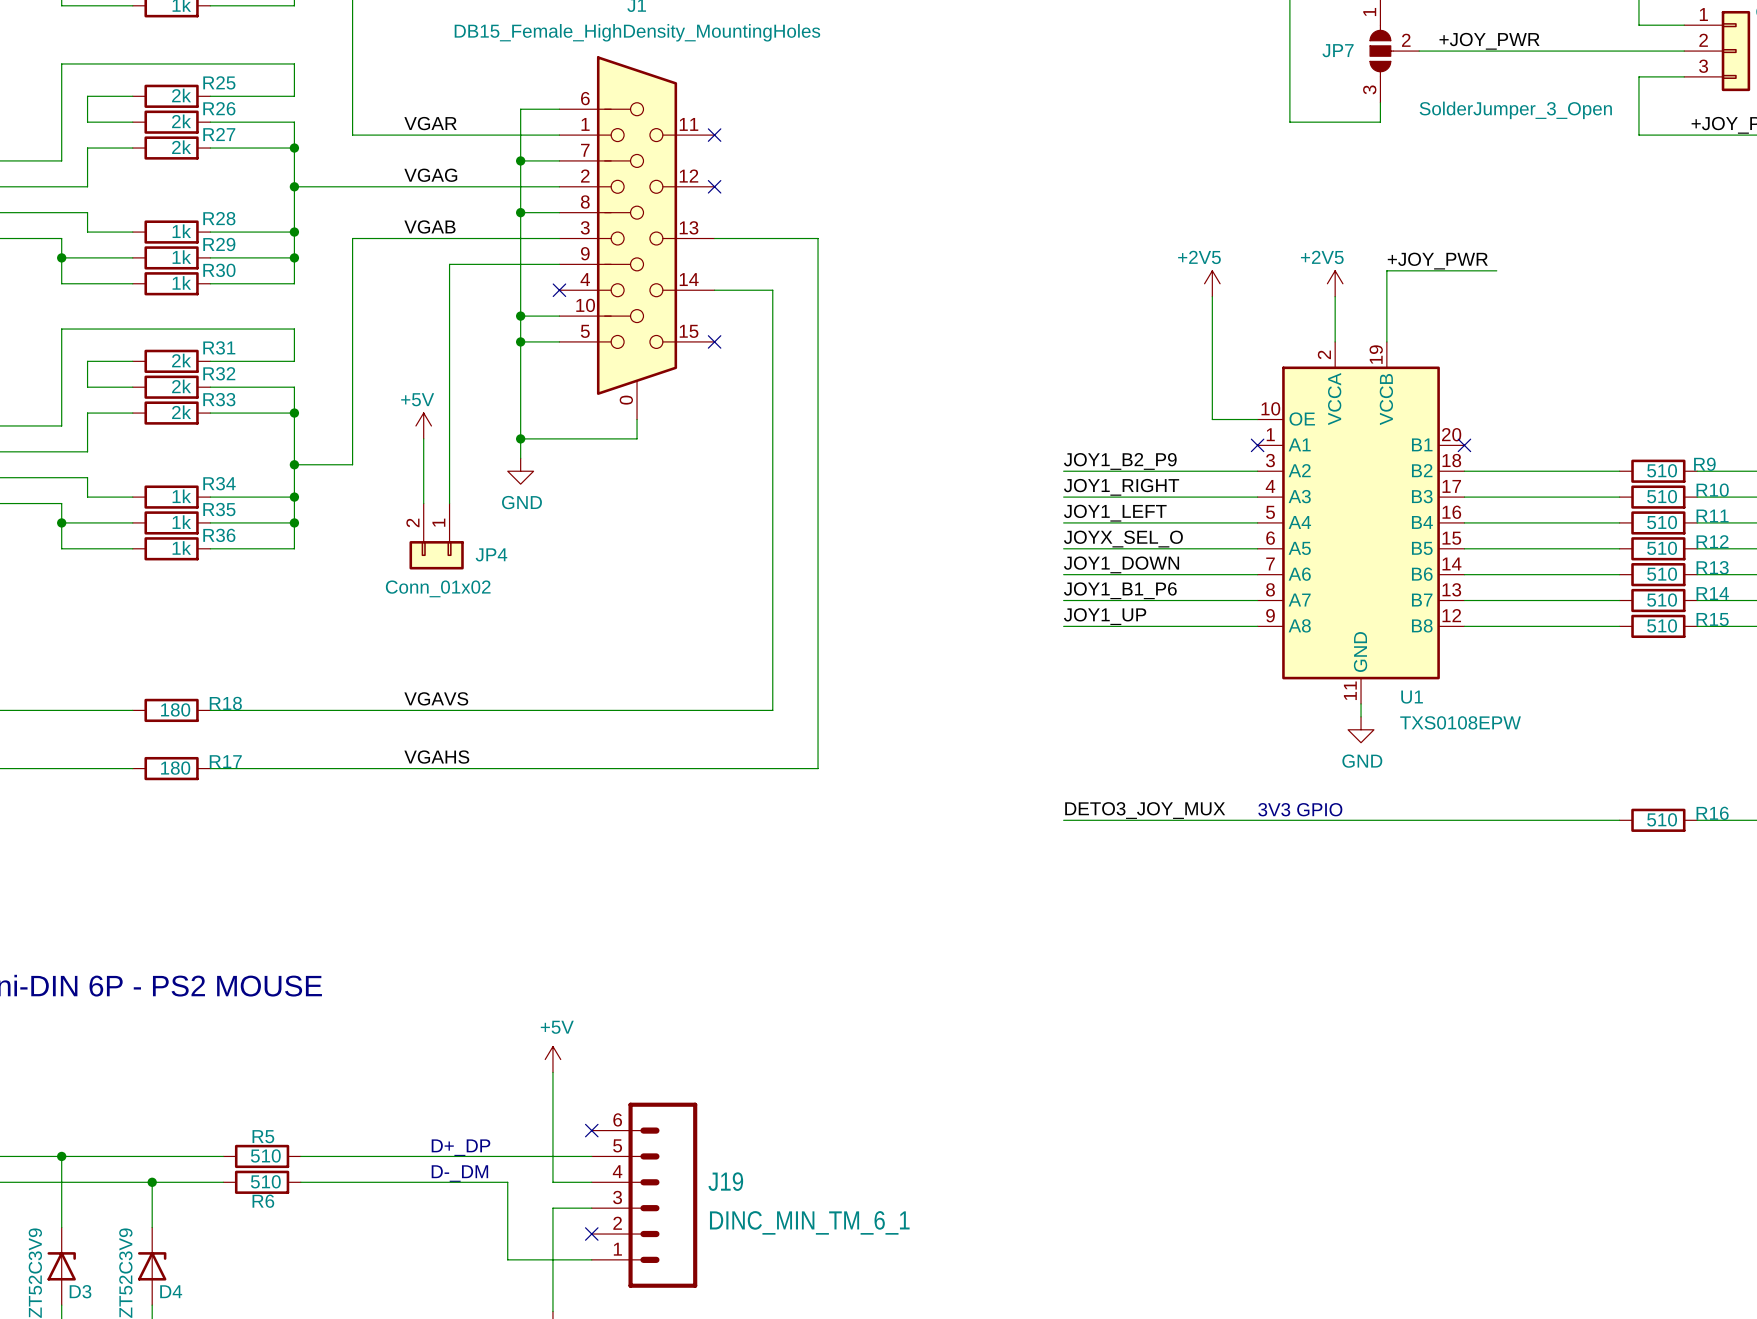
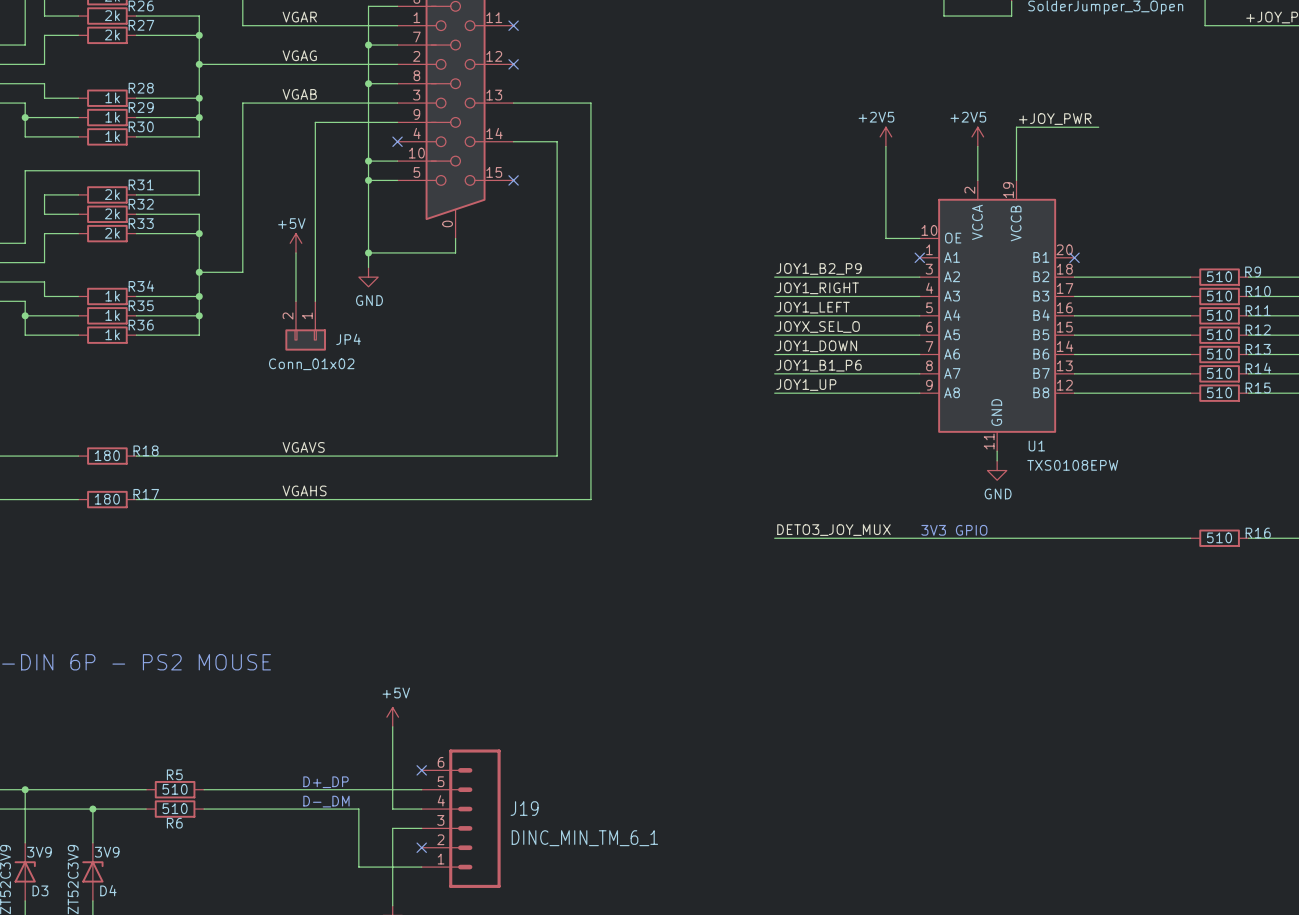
D3 text: none -> 3V9 (39, 852)
D4 text: none -> 3V9 (107, 852)

